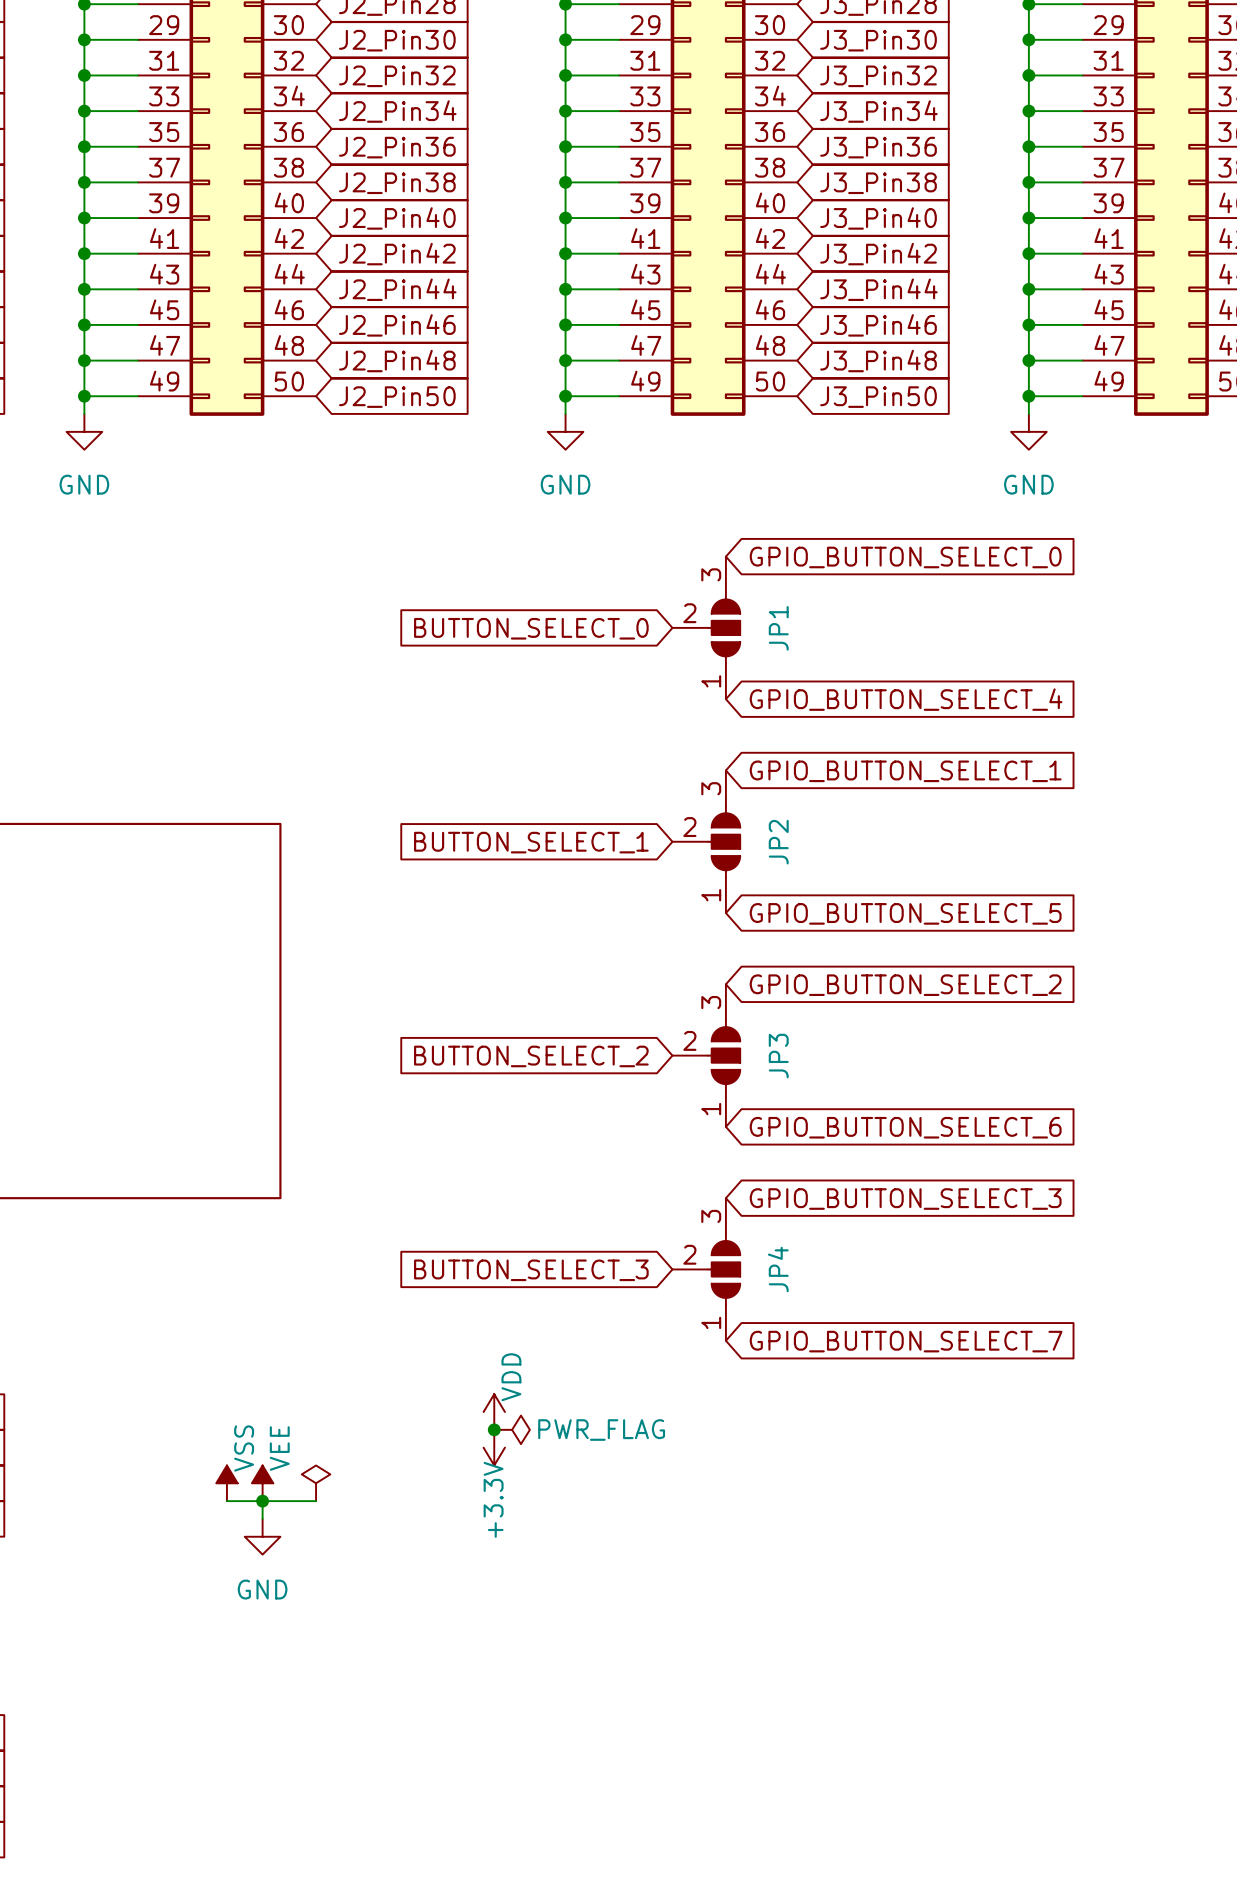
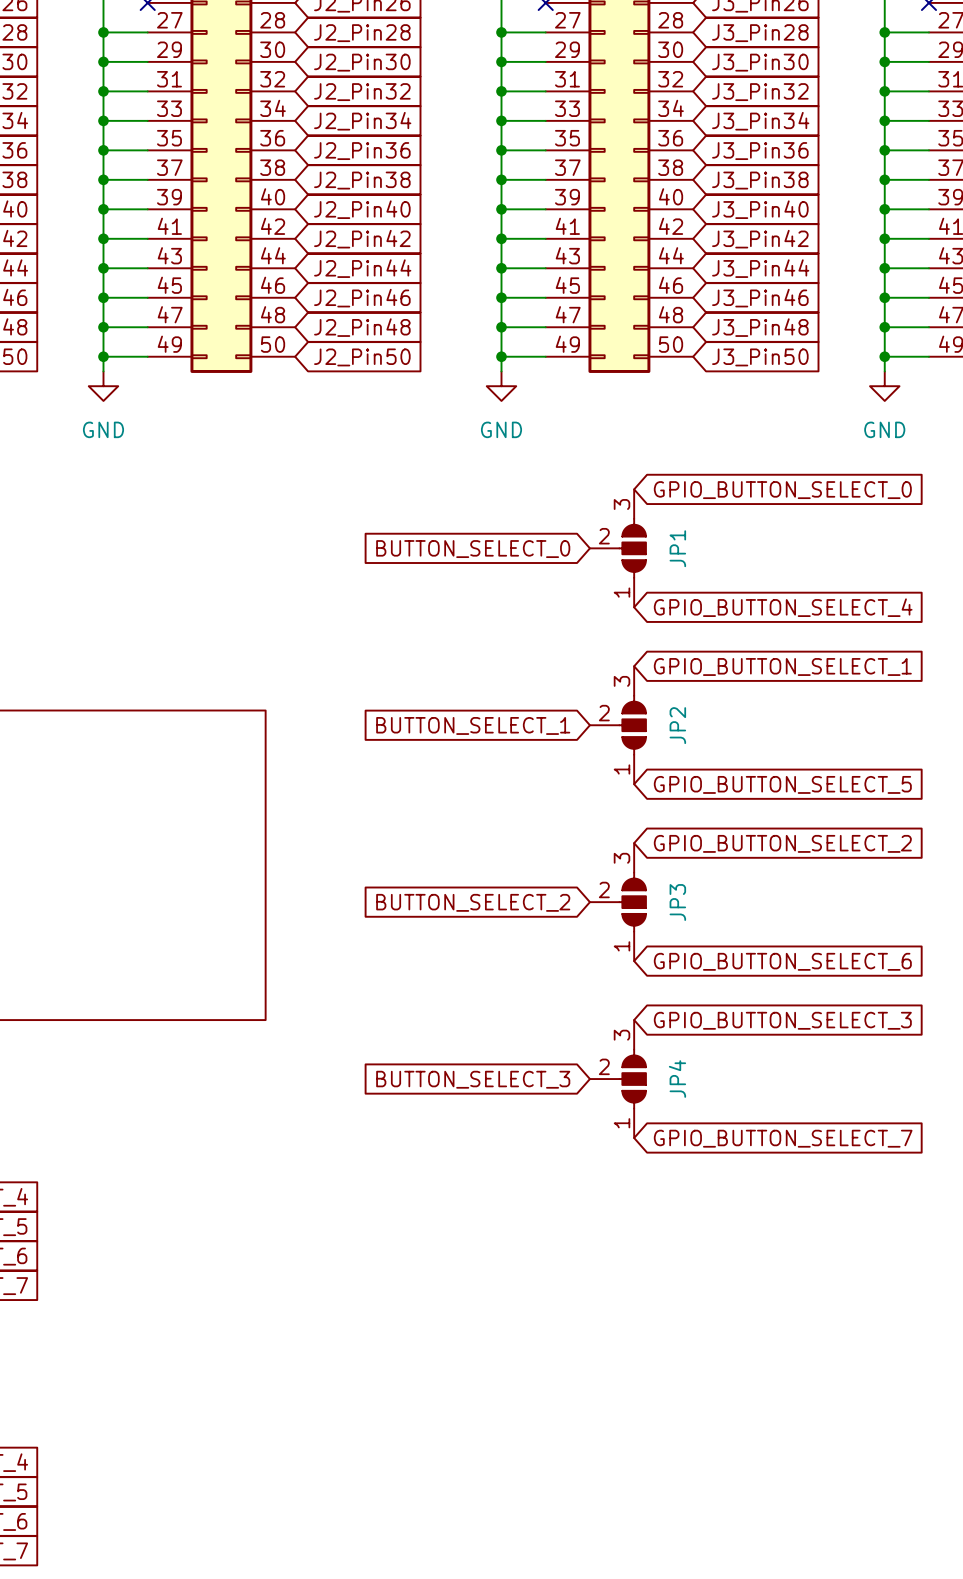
power symbol: VDD (494, 1412) -> none
junction: (494, 1429) -> none
power symbol: PWR_FLAG (512, 1429) -> none
power symbol: +3.3V (494, 1447) -> none
power symbol: VSS (226, 1483) -> none
power symbol: VEE (262, 1483) -> none
power symbol: (316, 1483) -> none
wire: (226, 1501) (316, 1501) -> none
wire: (262, 1501) (262, 1518) -> none
junction: (262, 1501) -> none
power symbol: GND (262, 1536) -> none

